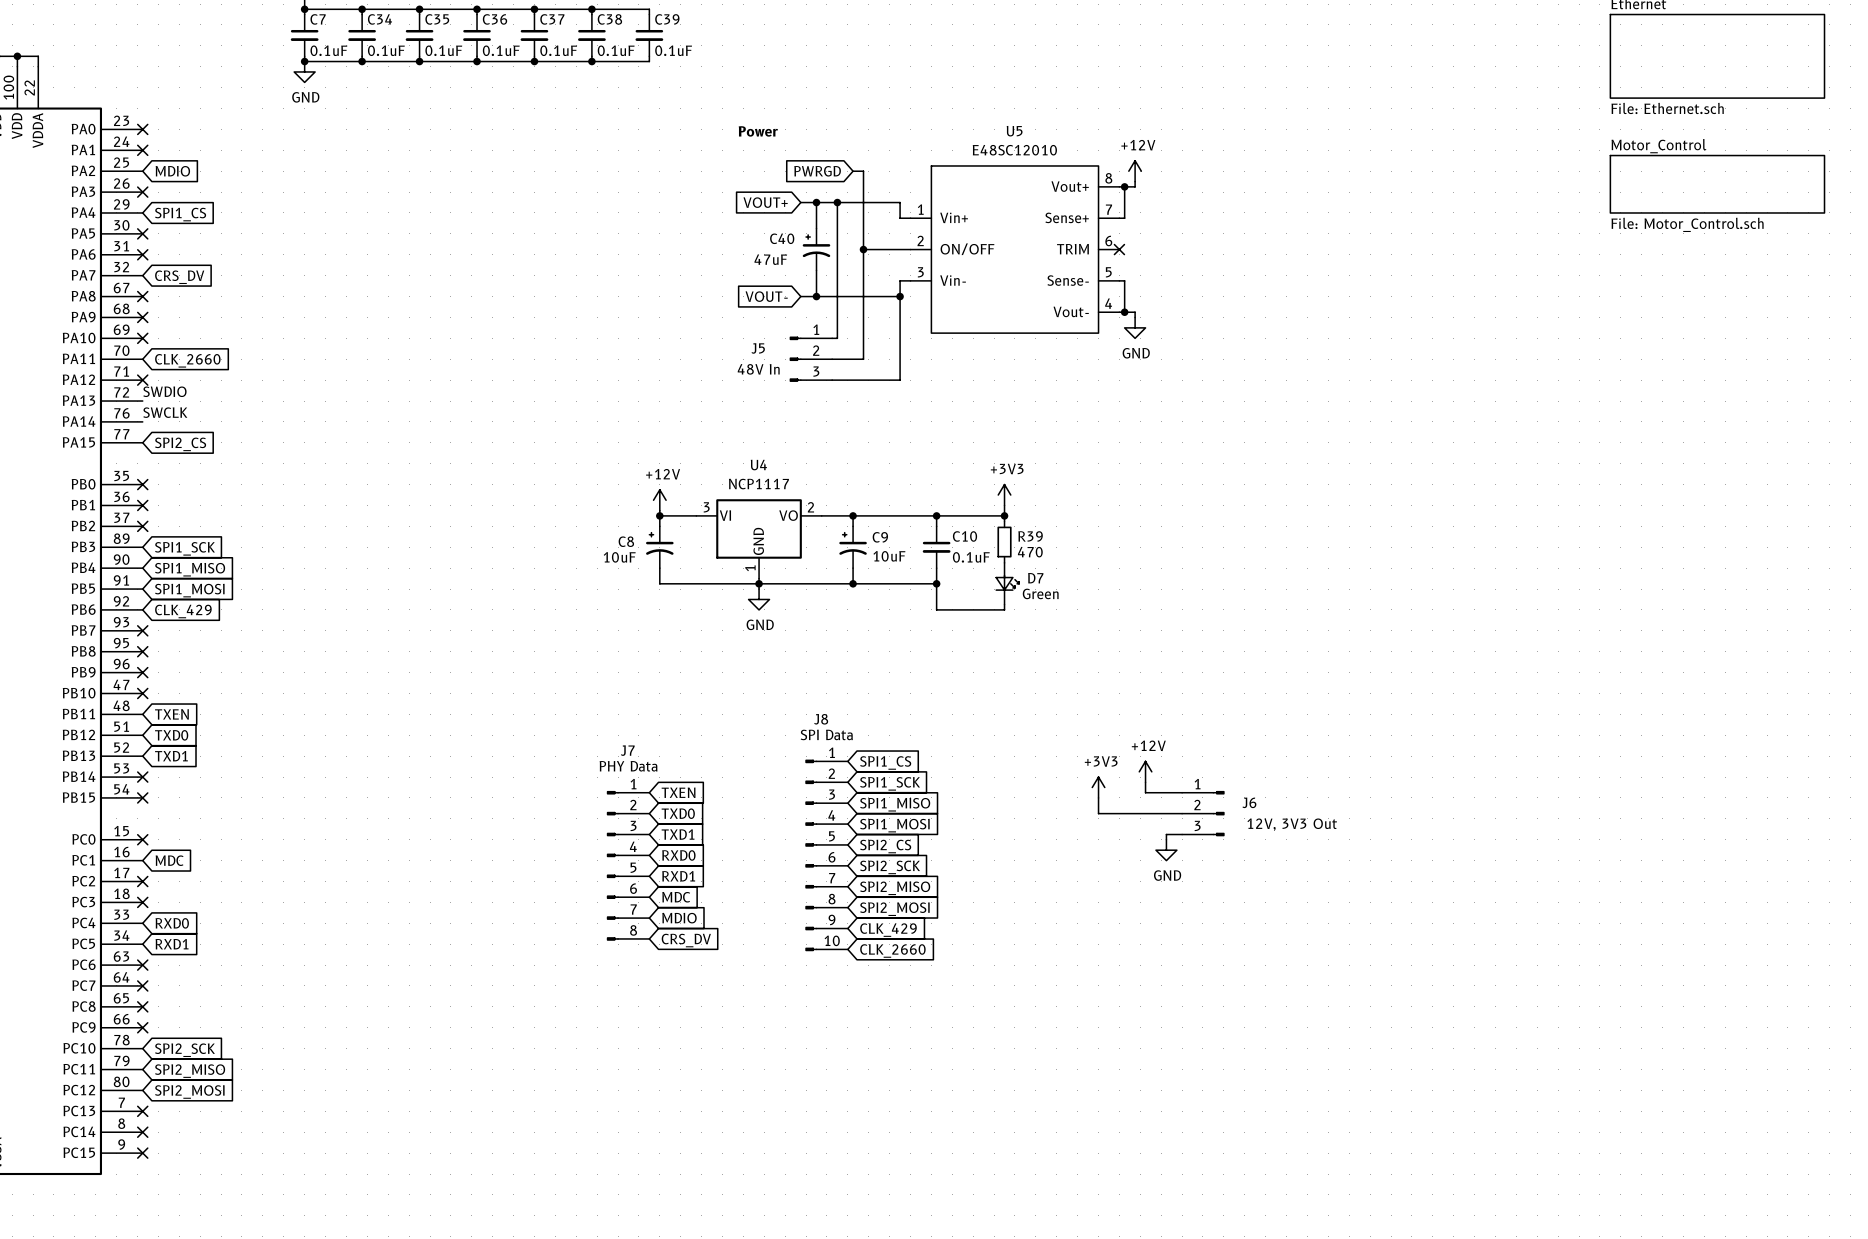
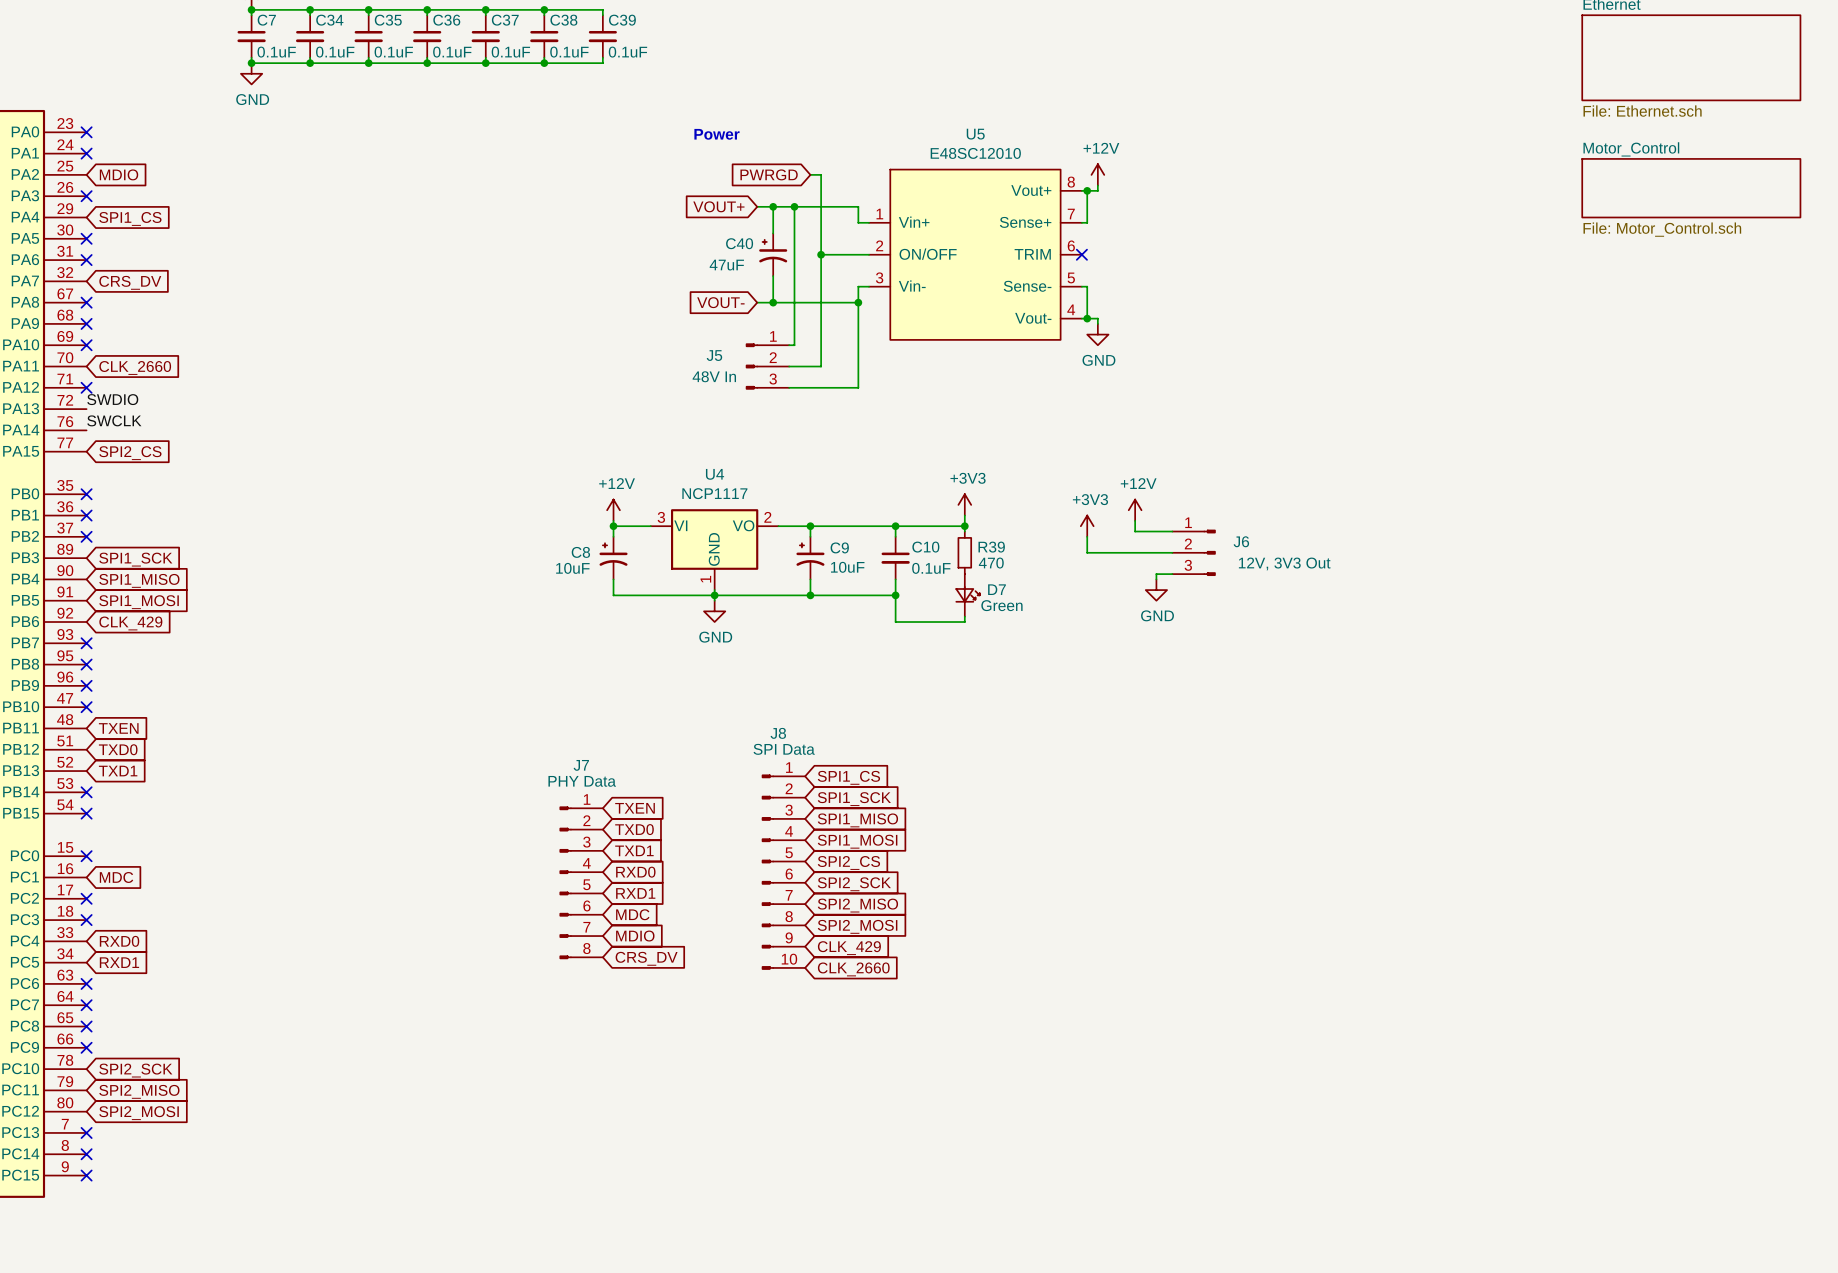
power symbol: none -> +12V (1135, 510)
wire: none -> (1135, 520) (1135, 531) (1172, 531)
power symbol: none -> +3V3 (1087, 526)
wire: none -> (1087, 536) (1087, 552) (1172, 552)
wire: none -> (1172, 574) (1156, 574) (1156, 579)
power symbol: none -> GND (1156, 590)
power symbol: +12V (1145, 771) -> none
wire: (1145, 782) (1145, 792) (1182, 792) -> none
power symbol: +3V3 (1098, 787) -> none
wire: (1098, 797) (1098, 813) (1182, 813) -> none
J6 position: (1203, 813) -> (1194, 552)
wire: (1182, 834) (1166, 834) (1166, 839) -> none
power symbol: GND (1166, 850) -> none

